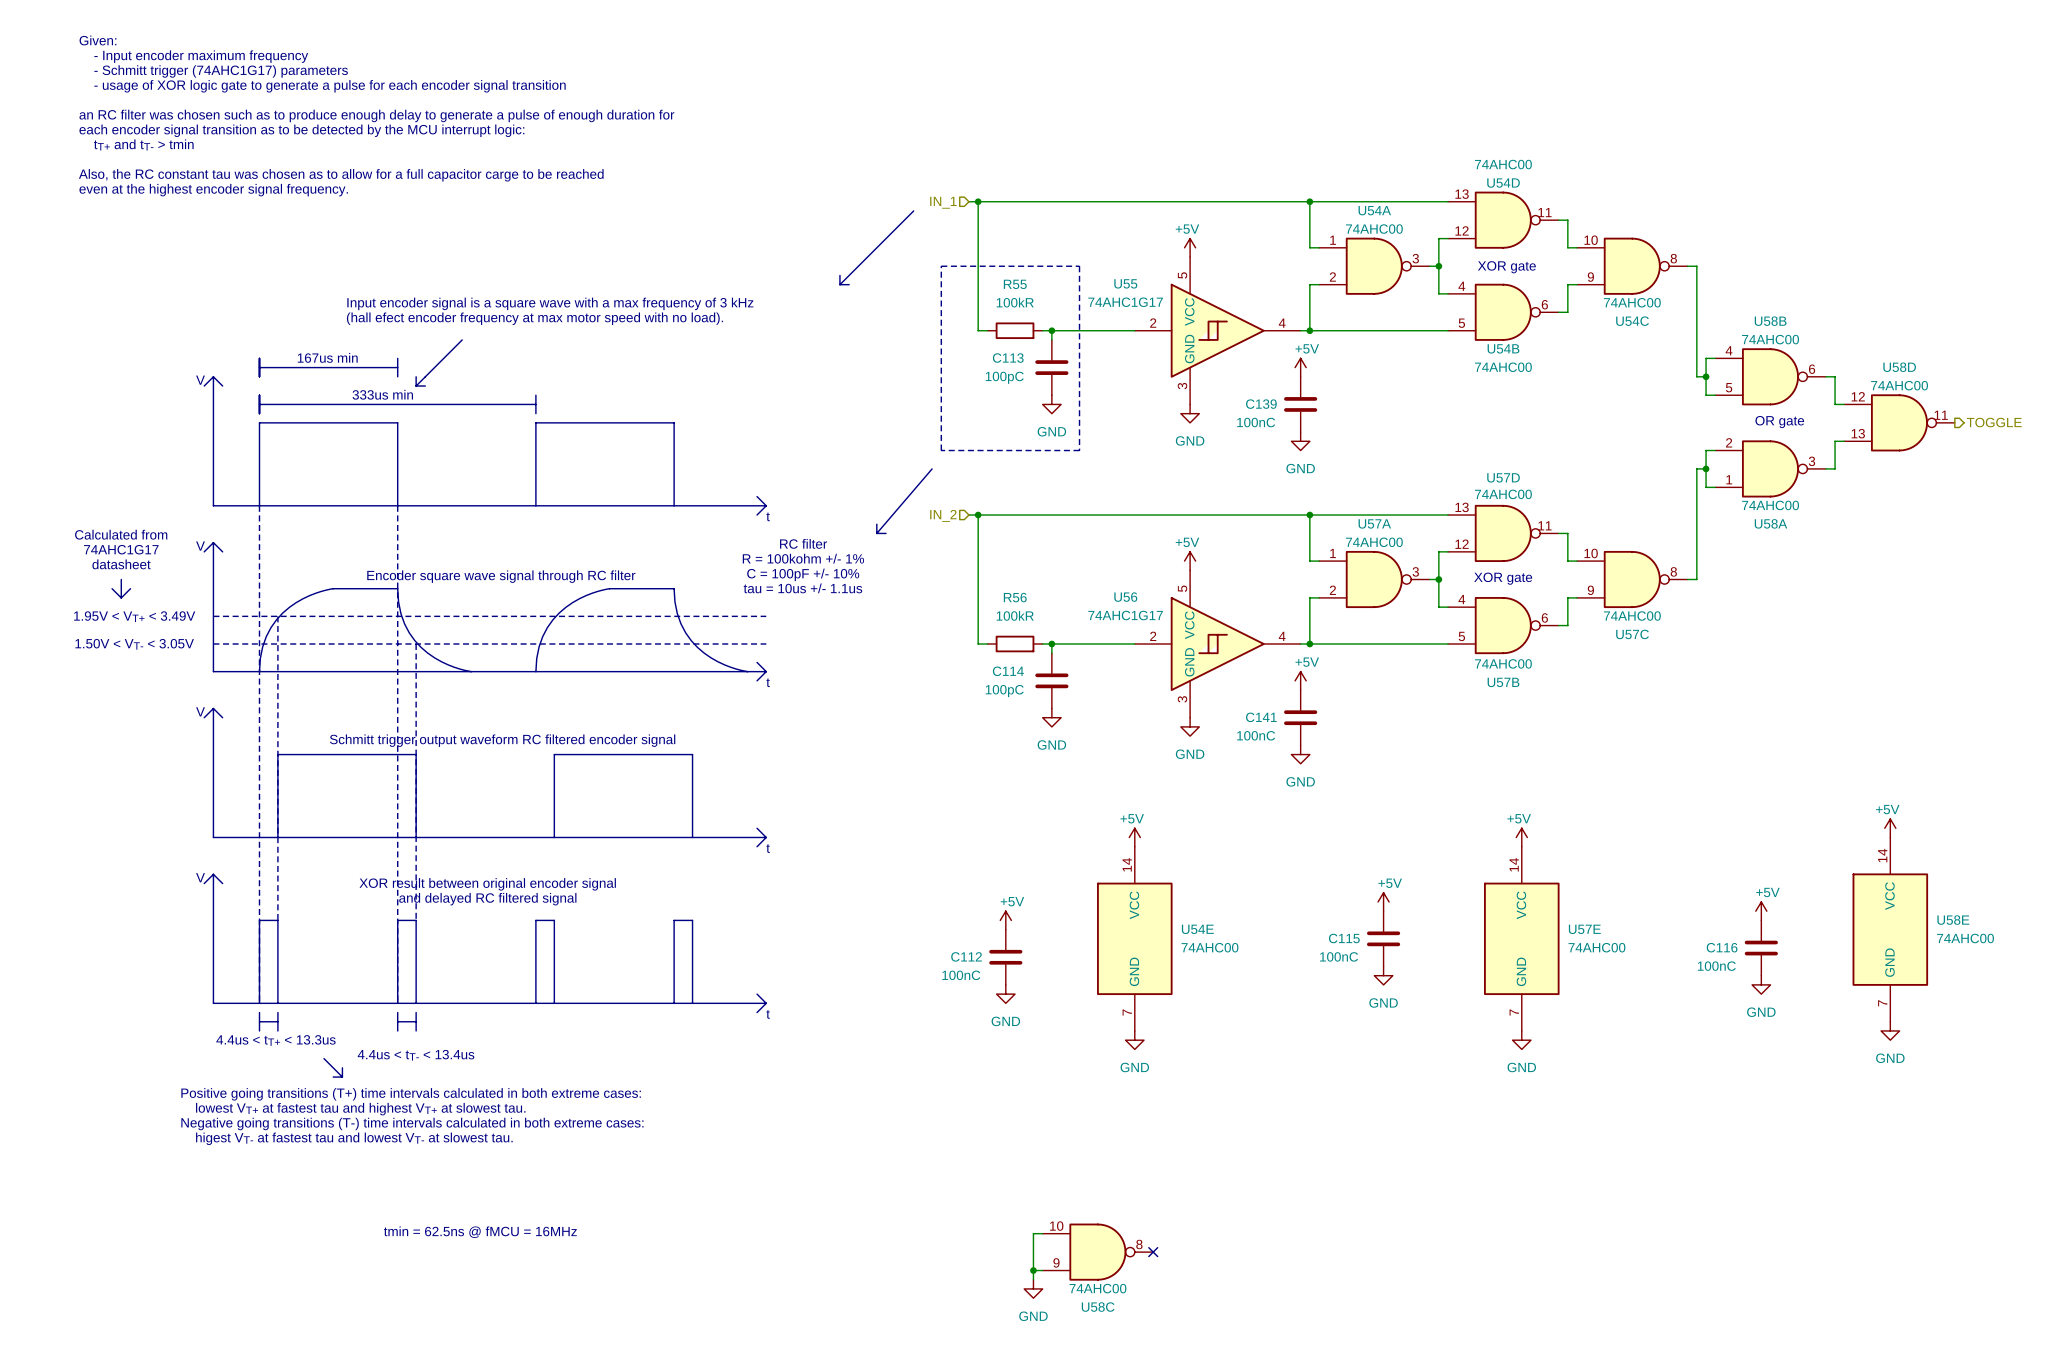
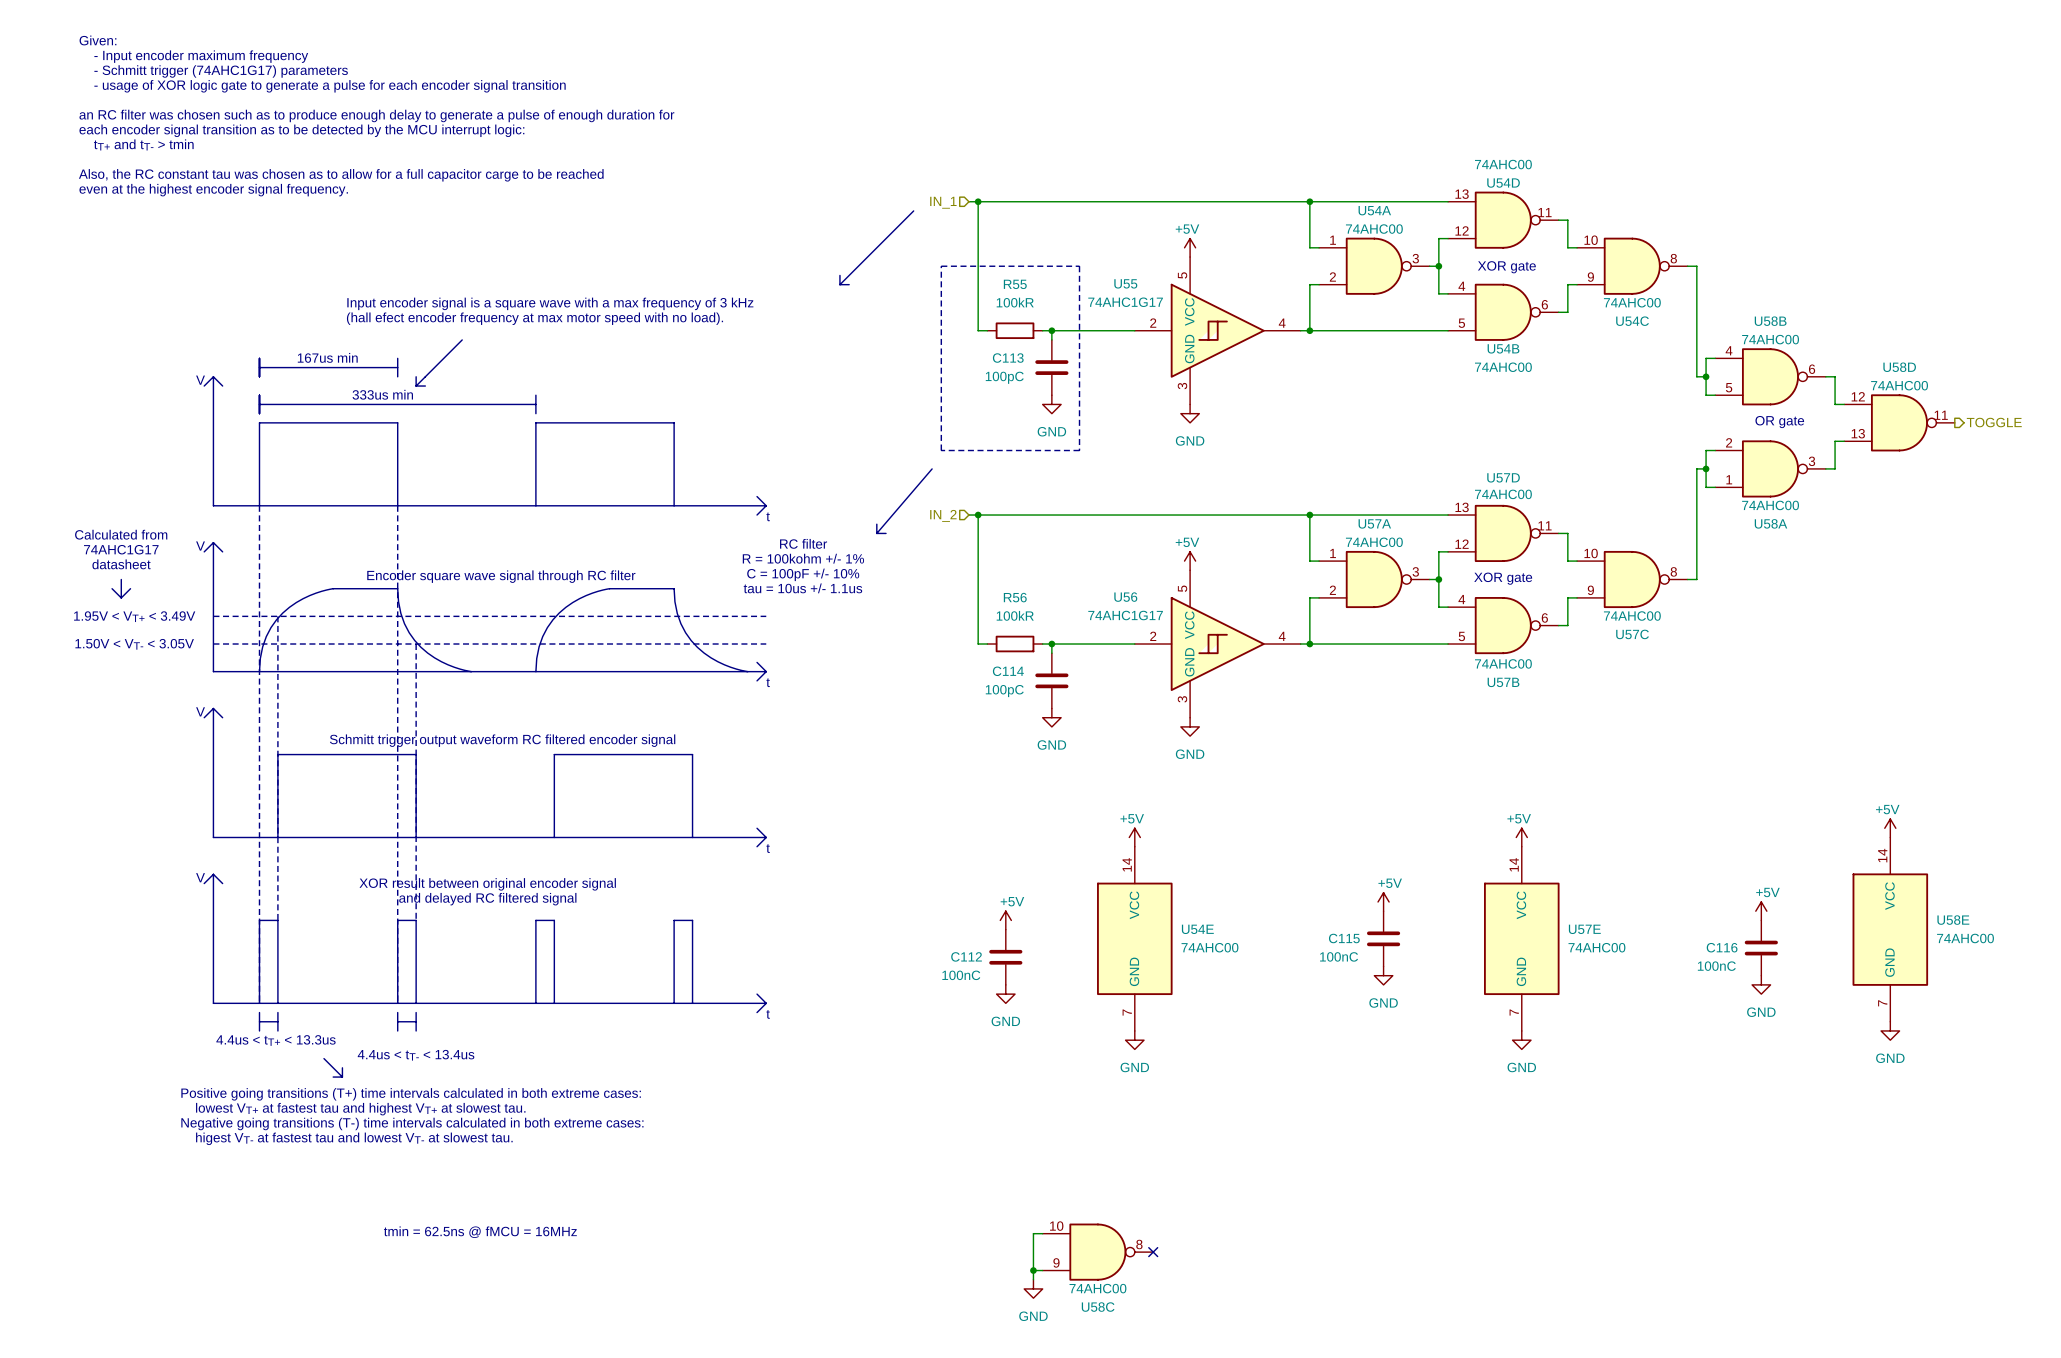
power symbol: +5V (1300, 367) -> none
C139: 100nC (1300, 404) -> none
power symbol: GND (1300, 441) -> none
power symbol: +5V (1300, 680) -> none
C141: 100nC (1300, 717) -> none
power symbol: GND (1300, 754) -> none

